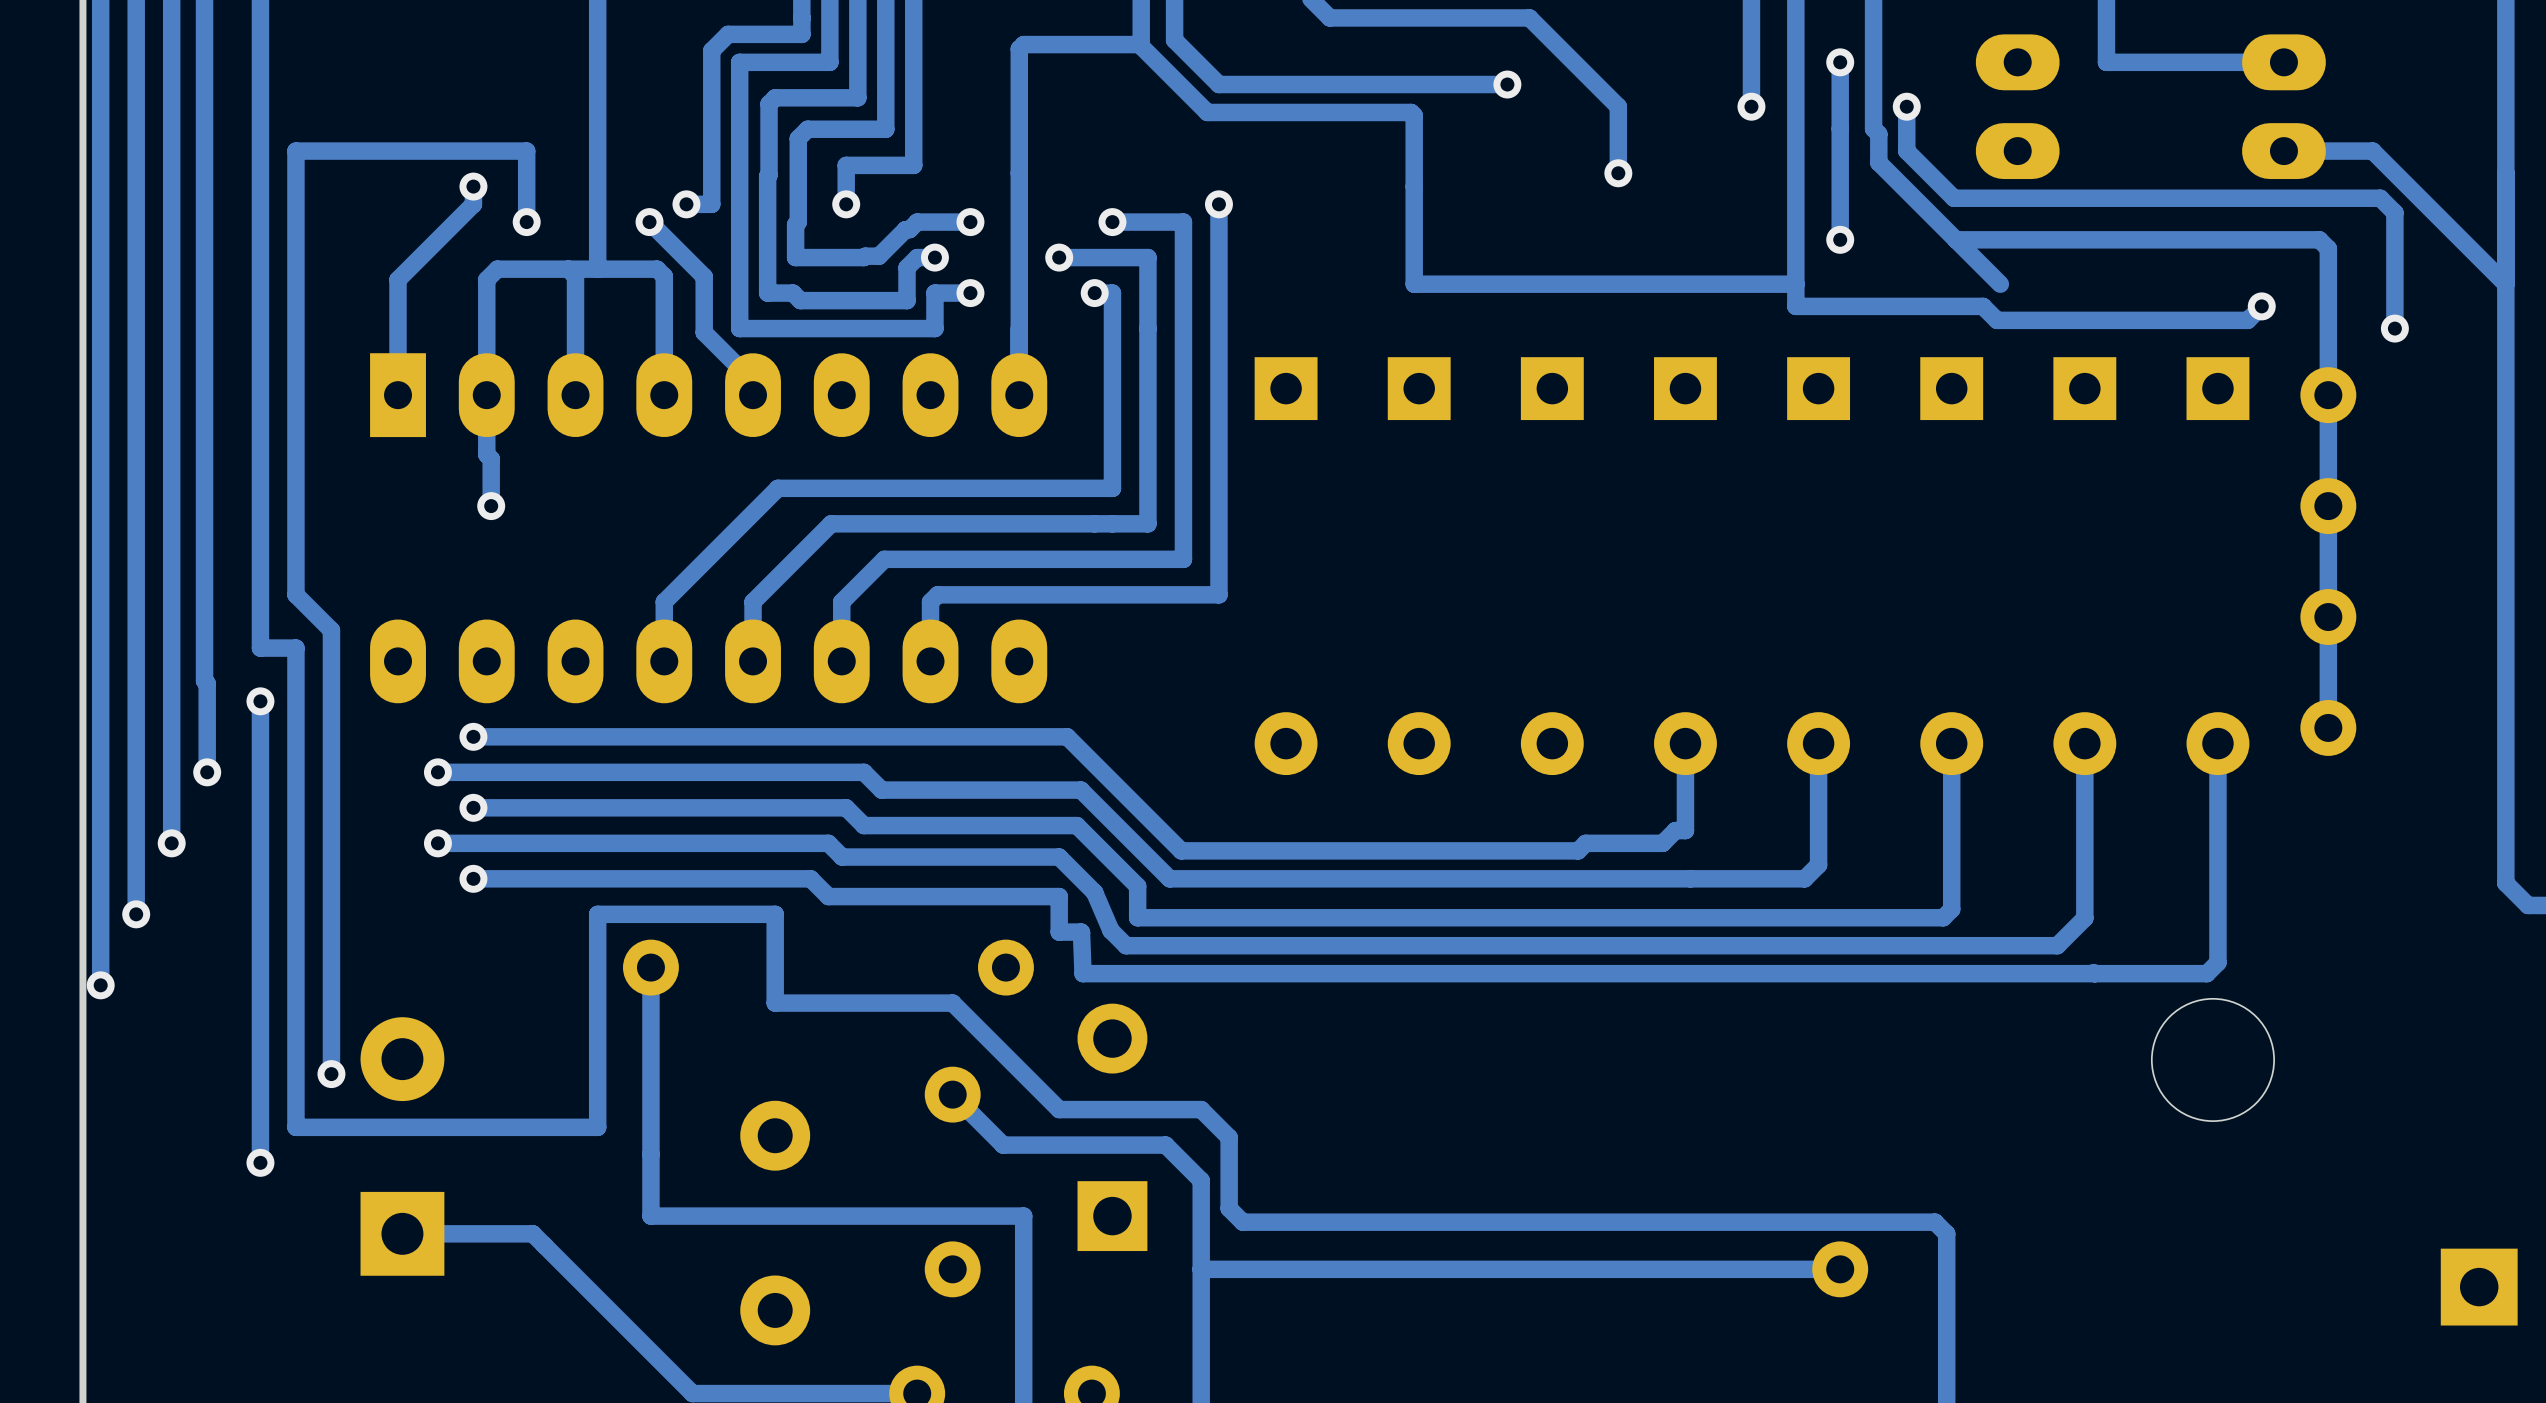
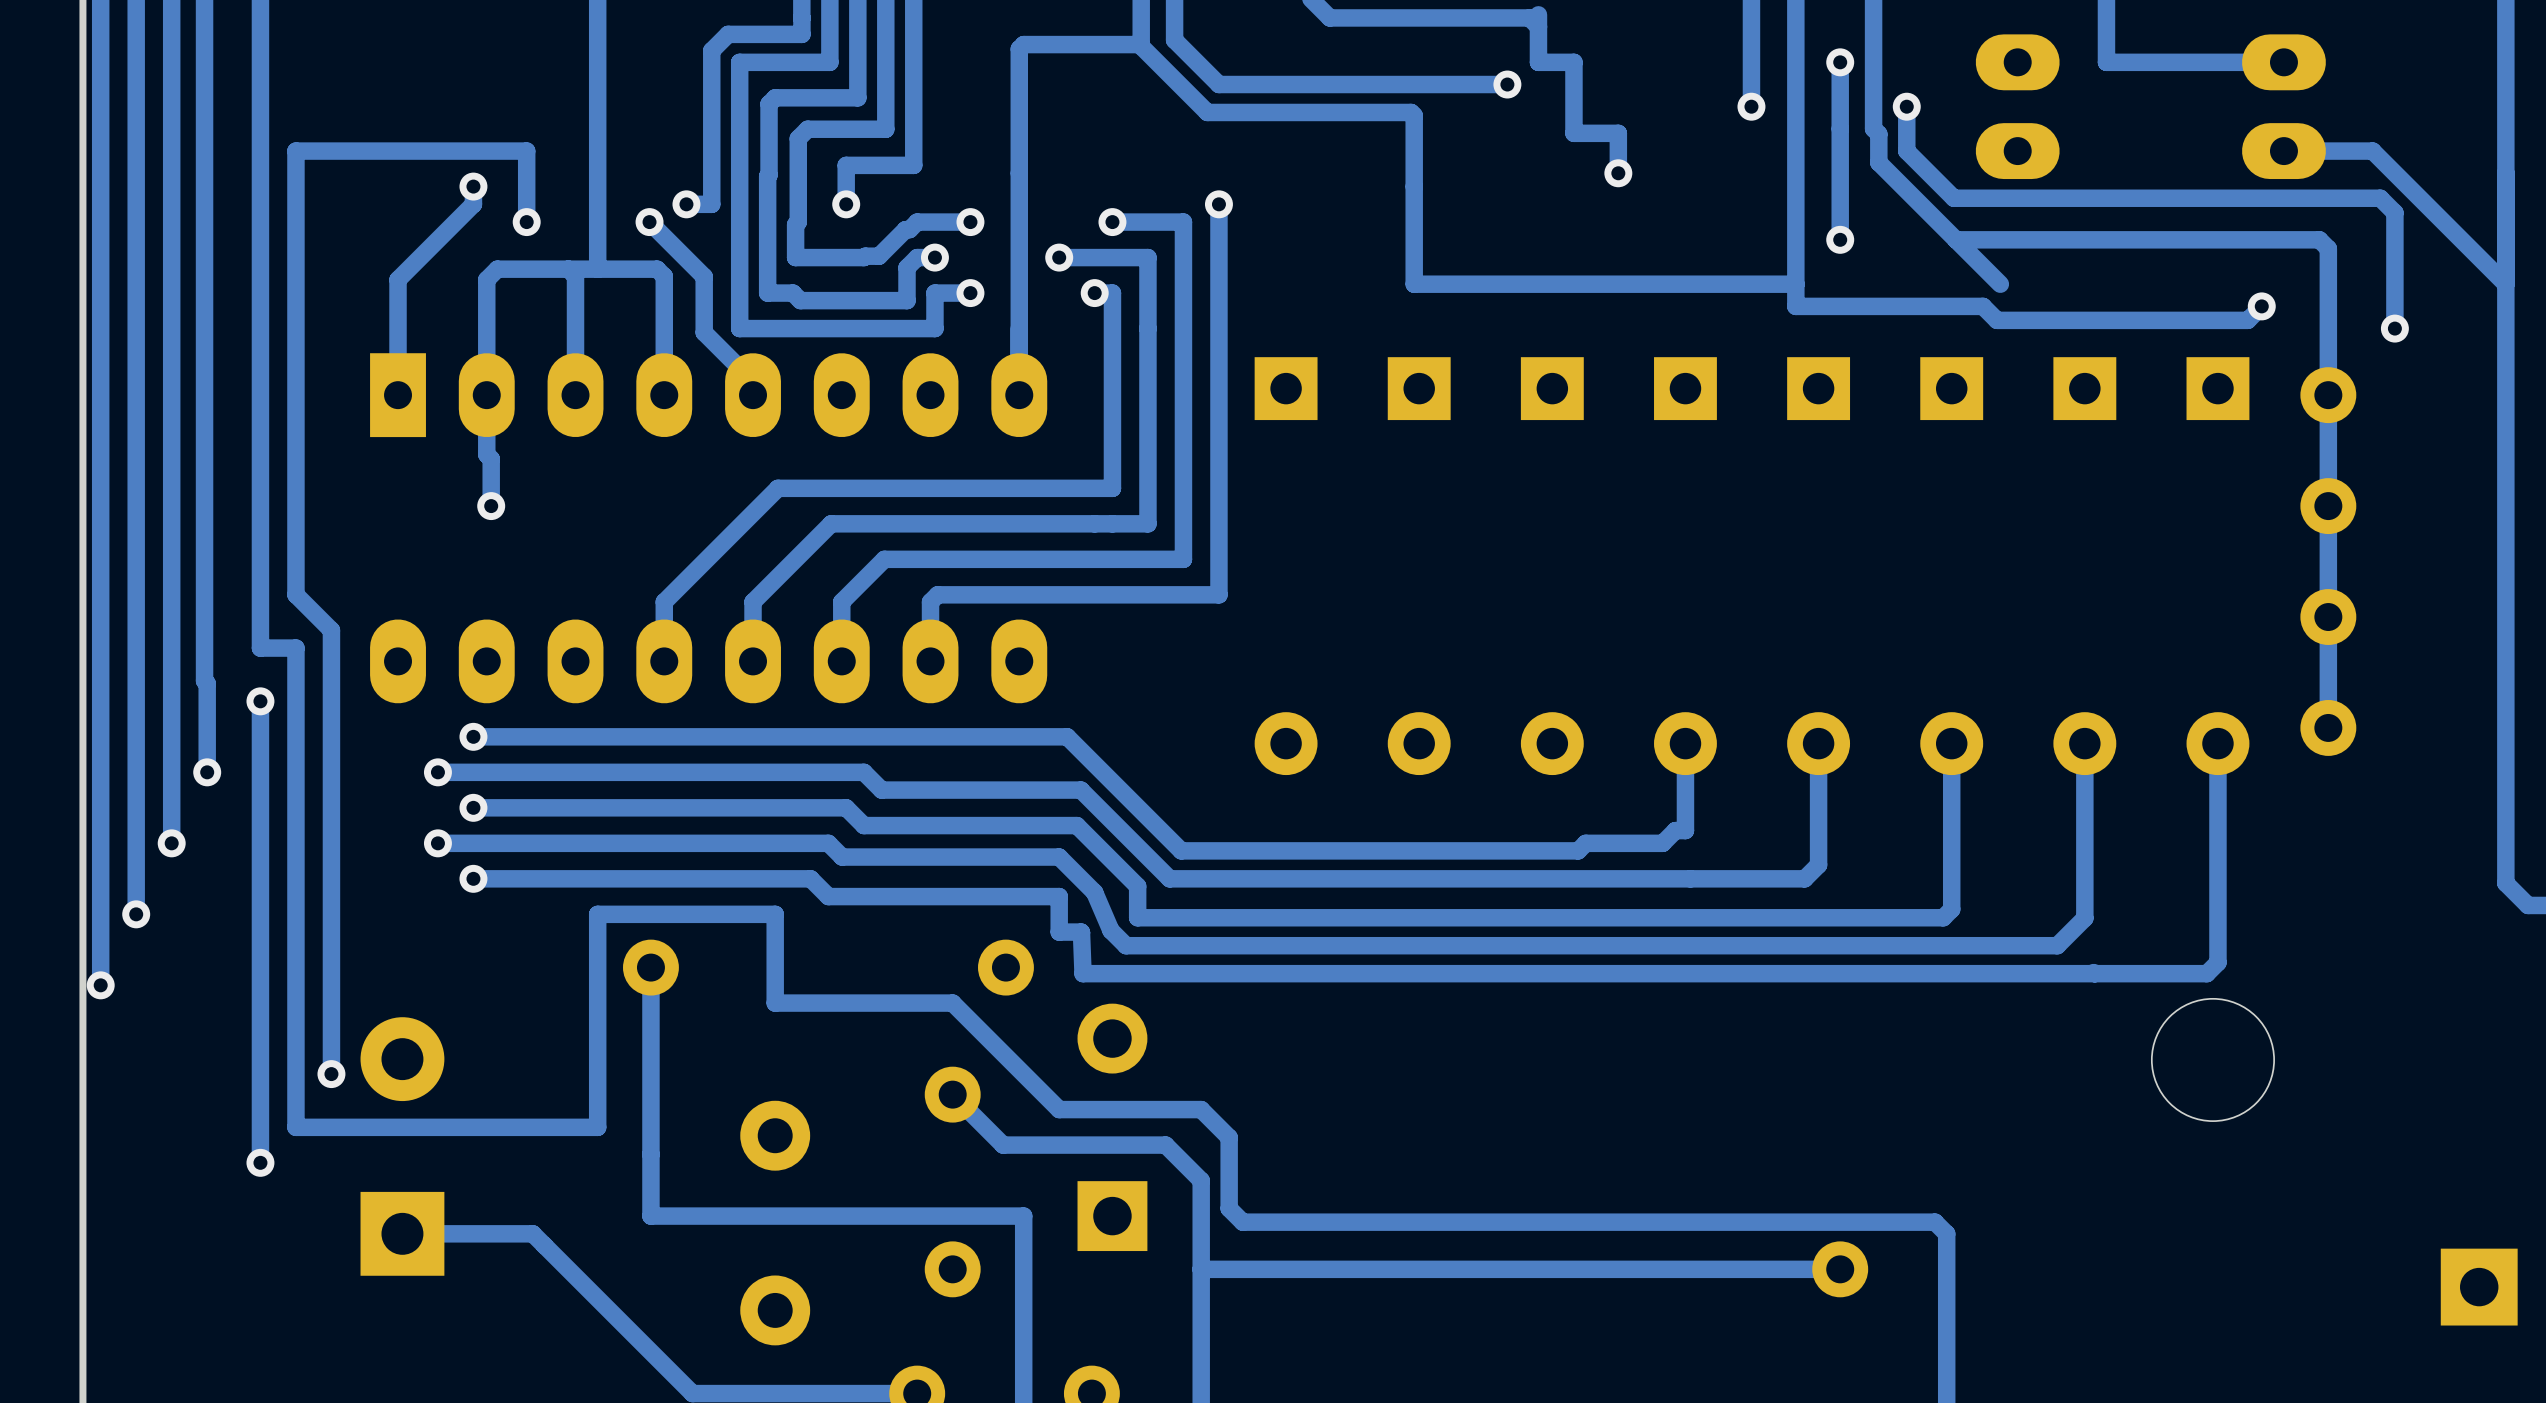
track: (1538, 26) (1618, 106) (1618, 133) -> (1538, 14) (1538, 62) (1573, 62) (1573, 133) (1618, 133)

